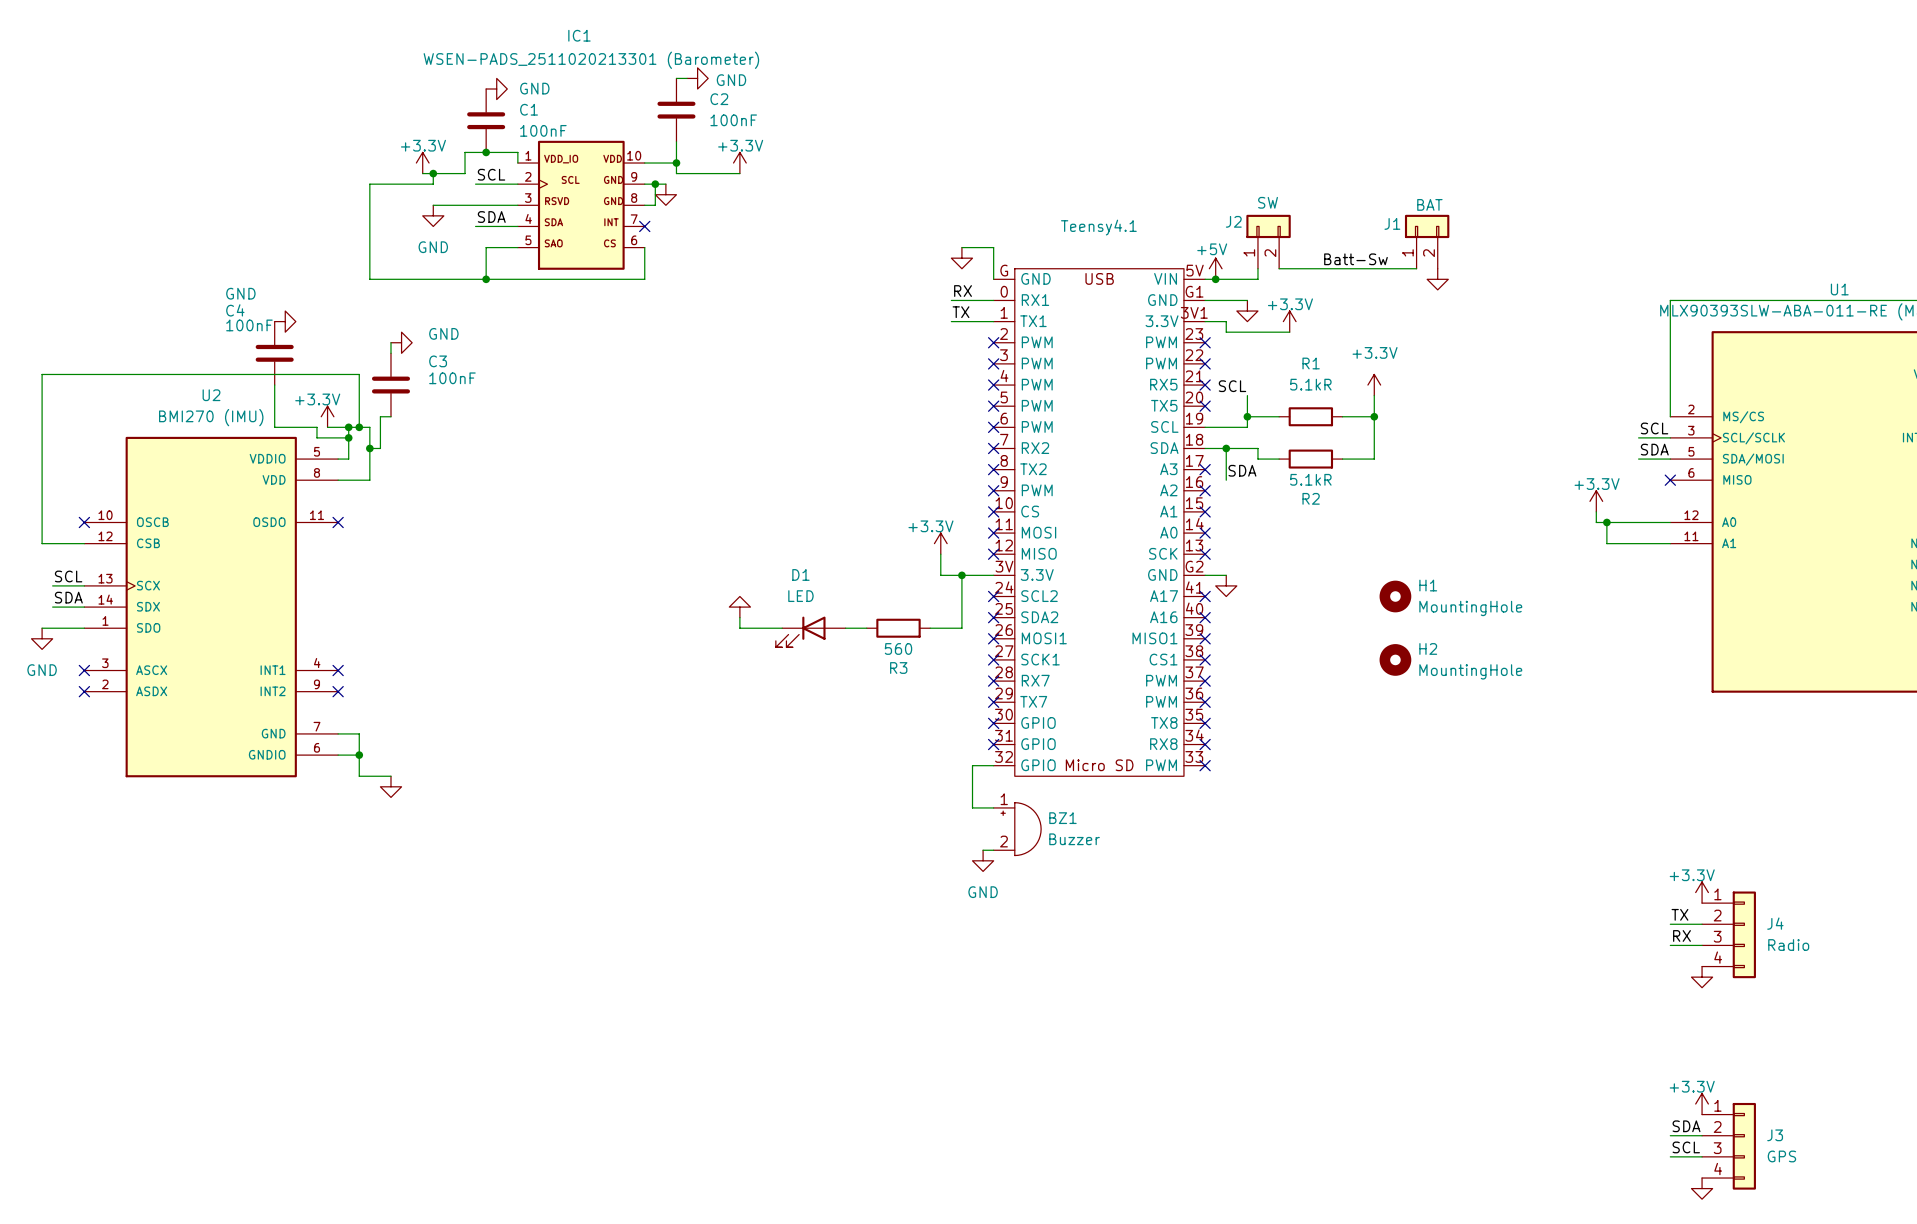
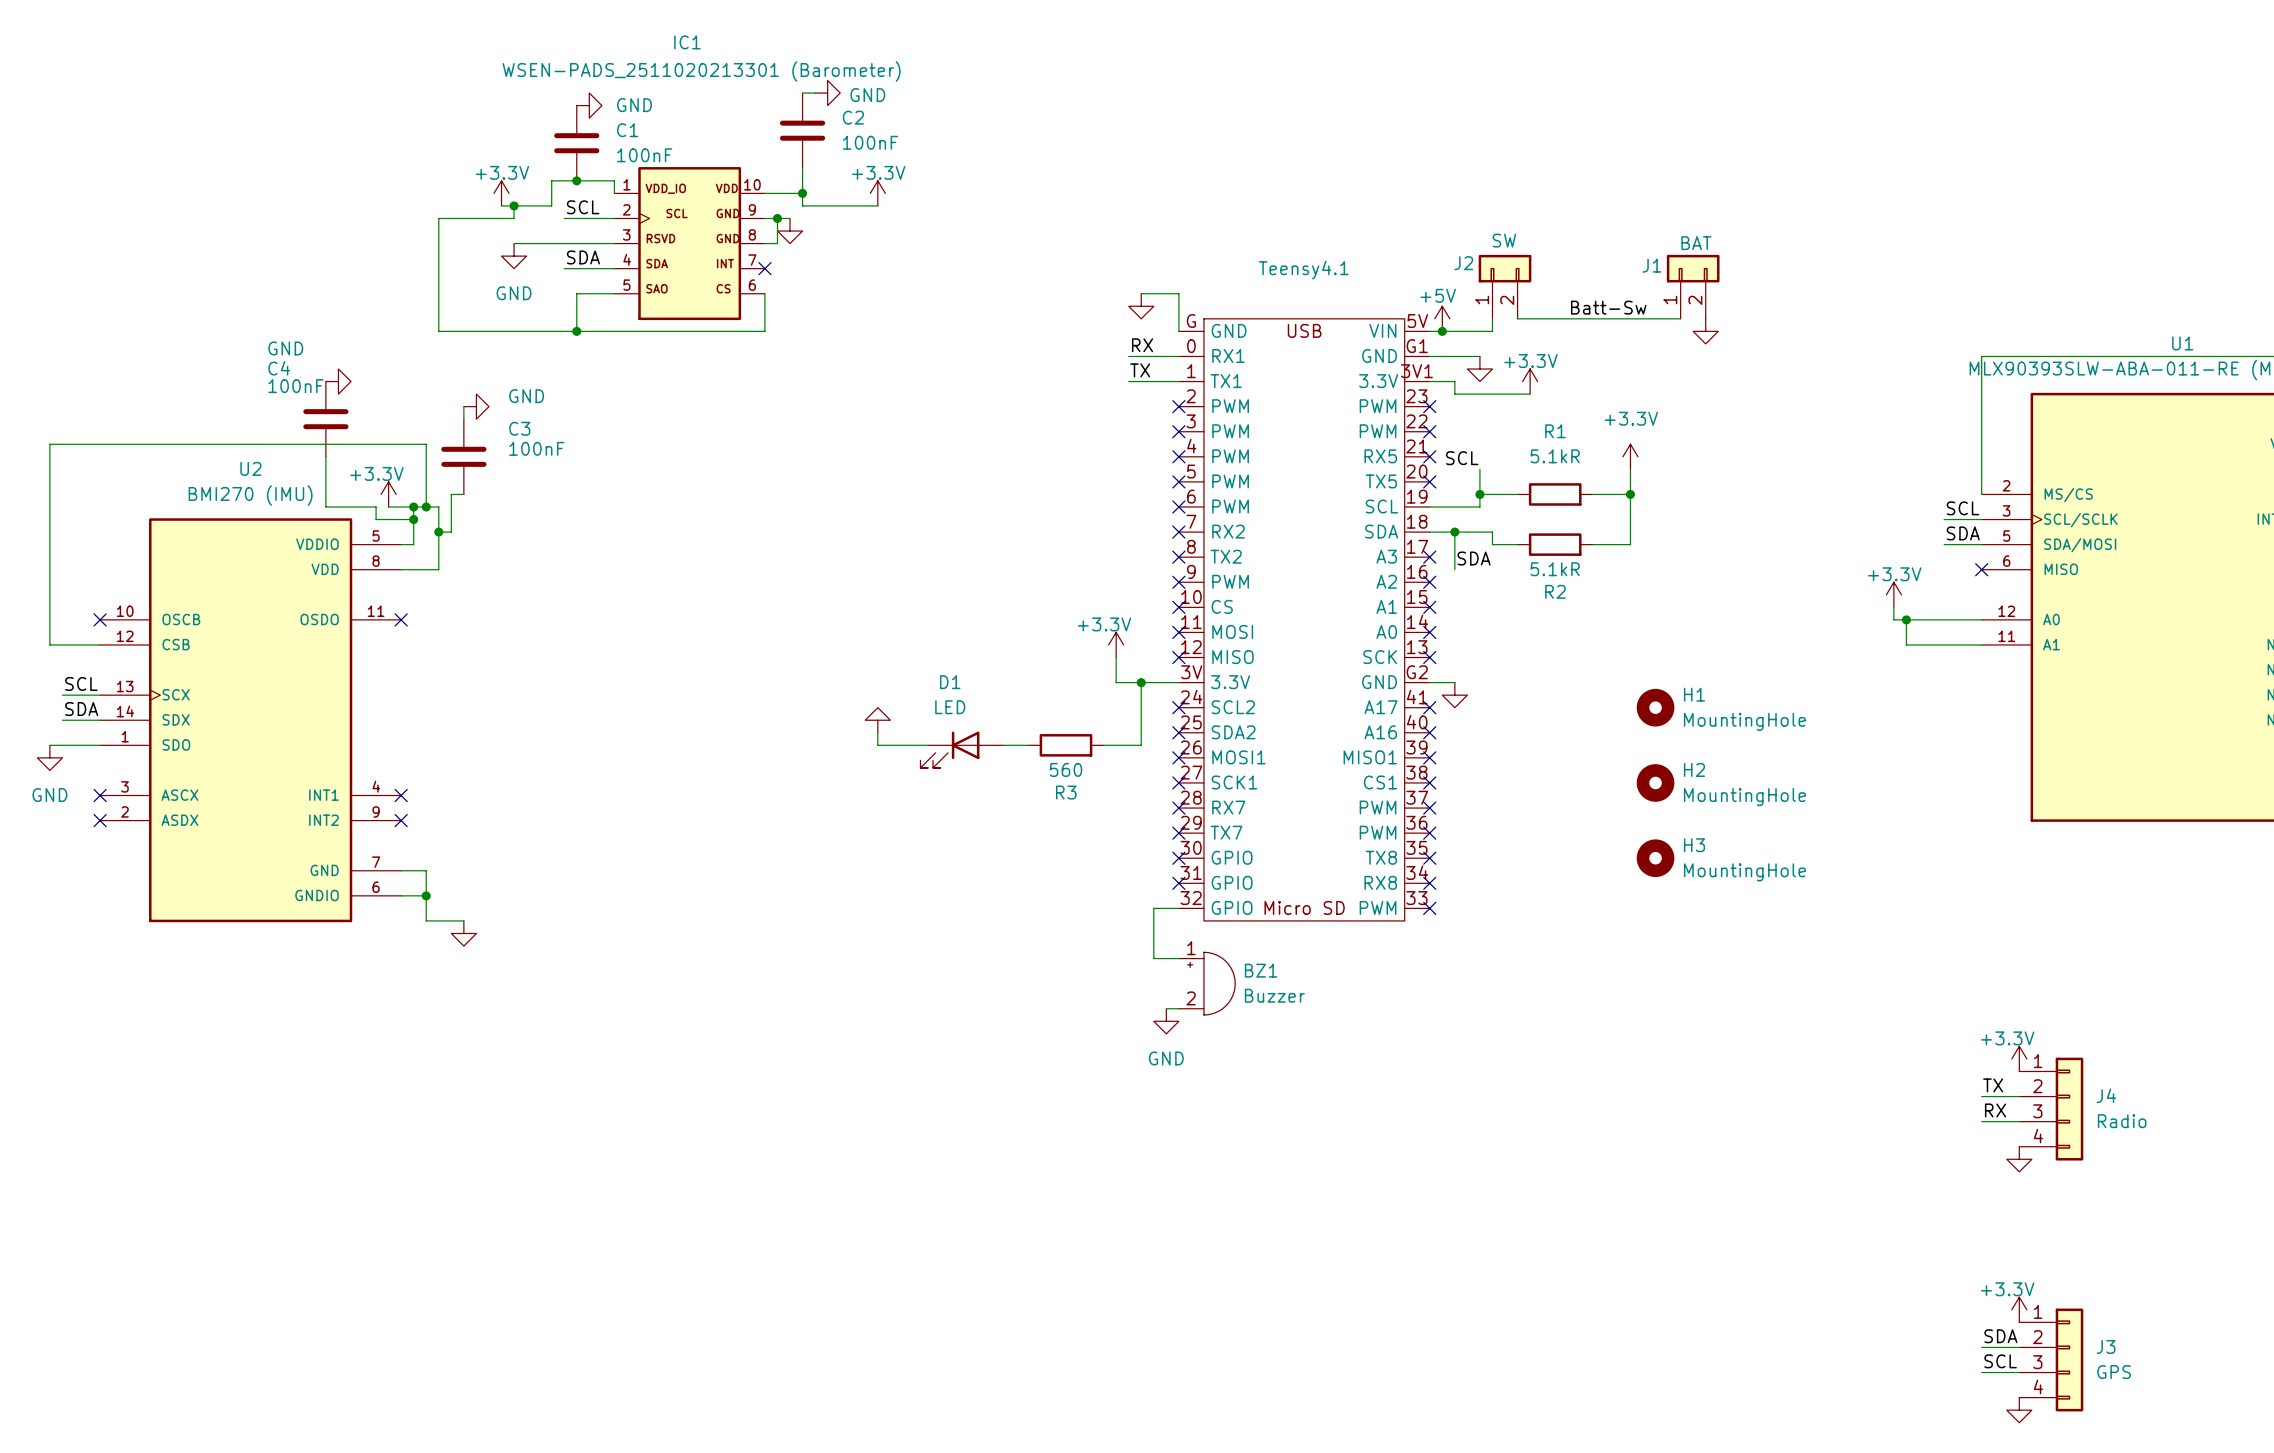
H3: none -> MountingHole (1655, 858)

